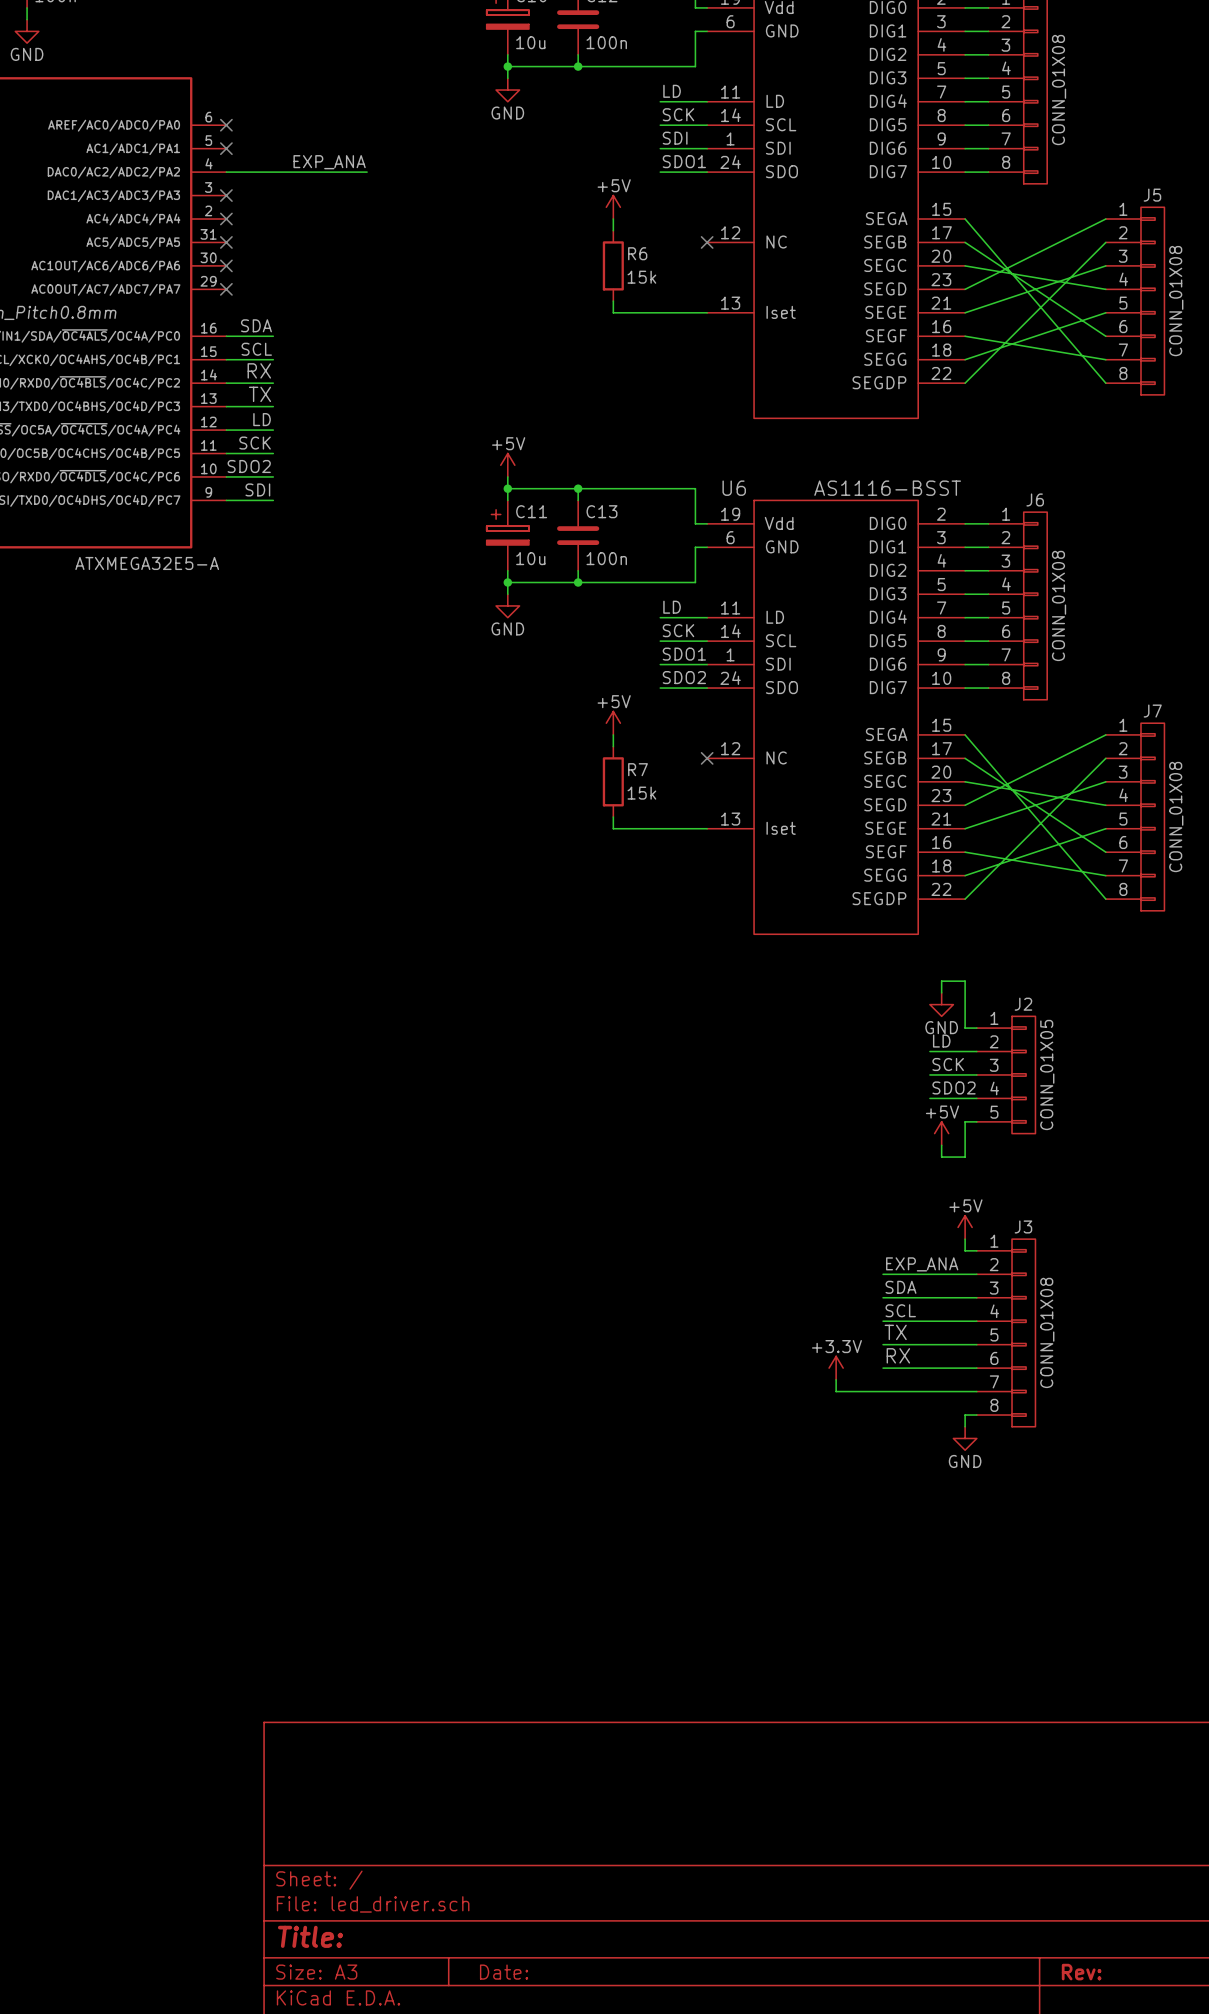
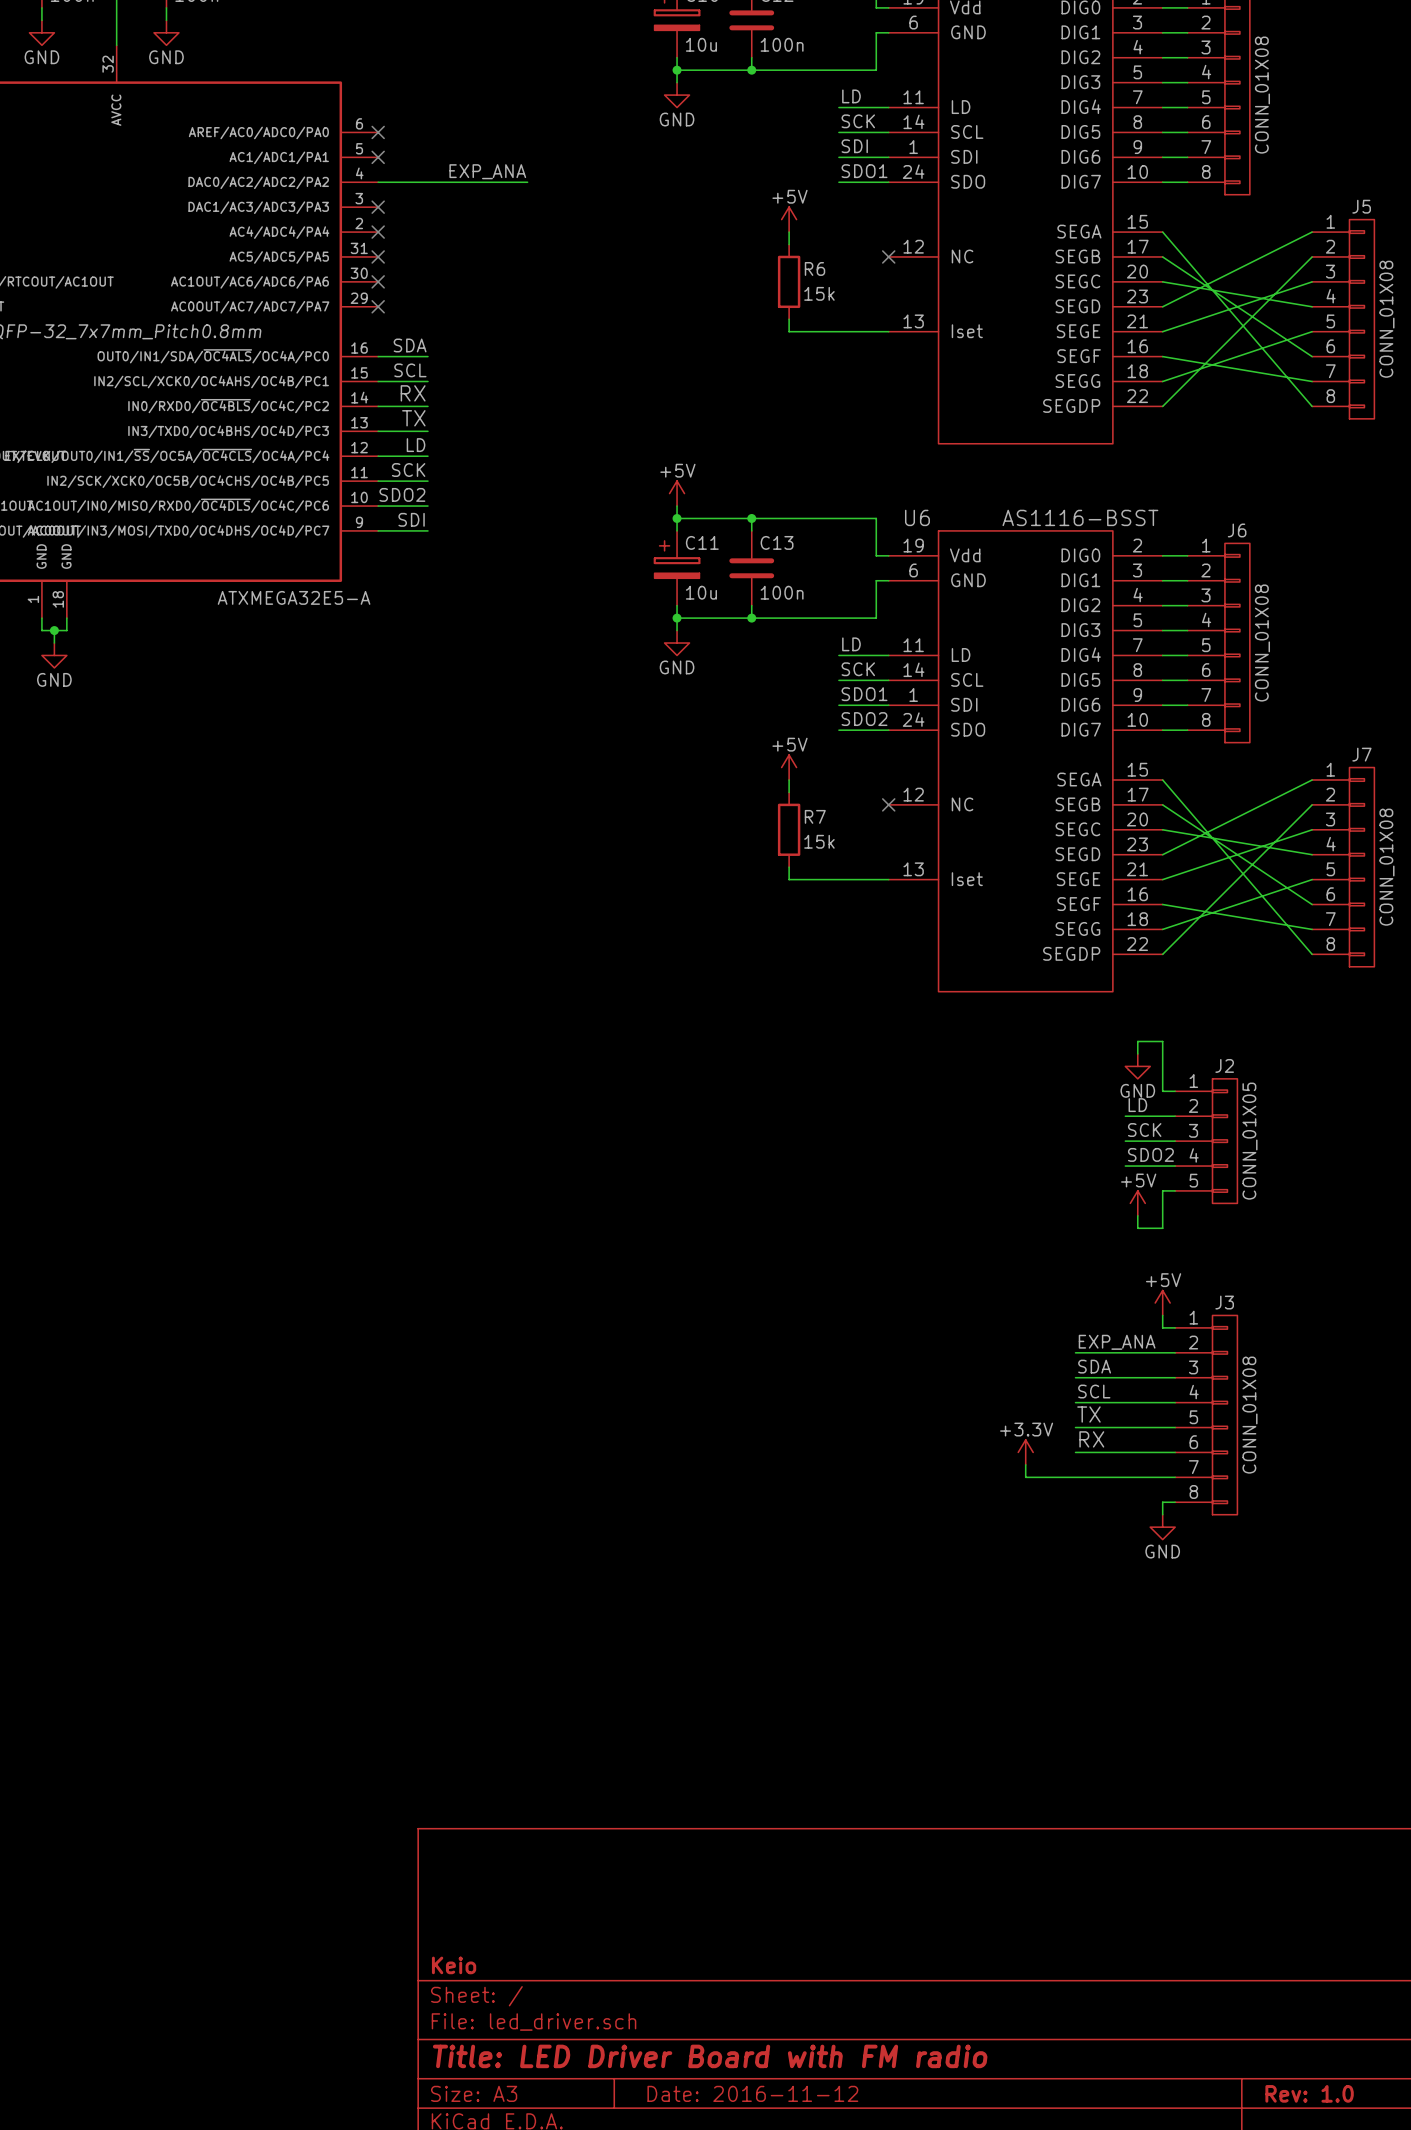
title block: none -> Keio (454, 1965)
title block: Title: (310, 1936) -> Title: LED Driver Board with FM radio (710, 2056)
title block: Date: (504, 1972) -> Date: 2016-11-12 (752, 2093)
title block: Rev: (1081, 1972) -> Rev: 1.0 (1309, 2093)

